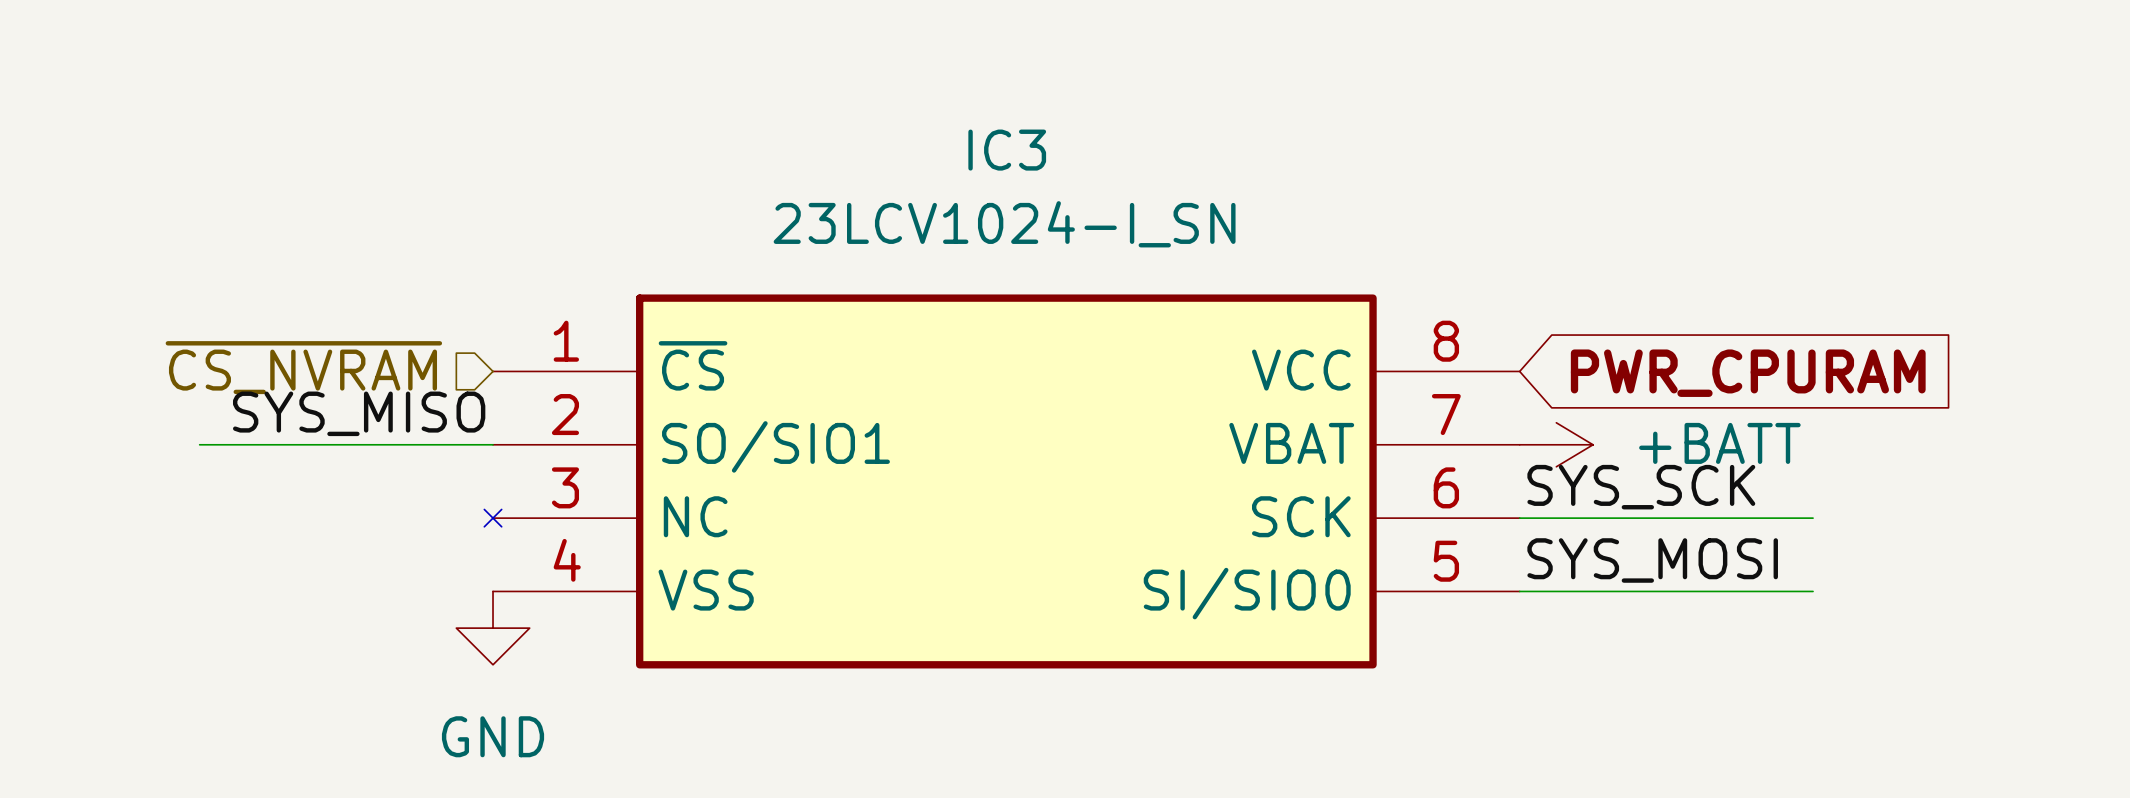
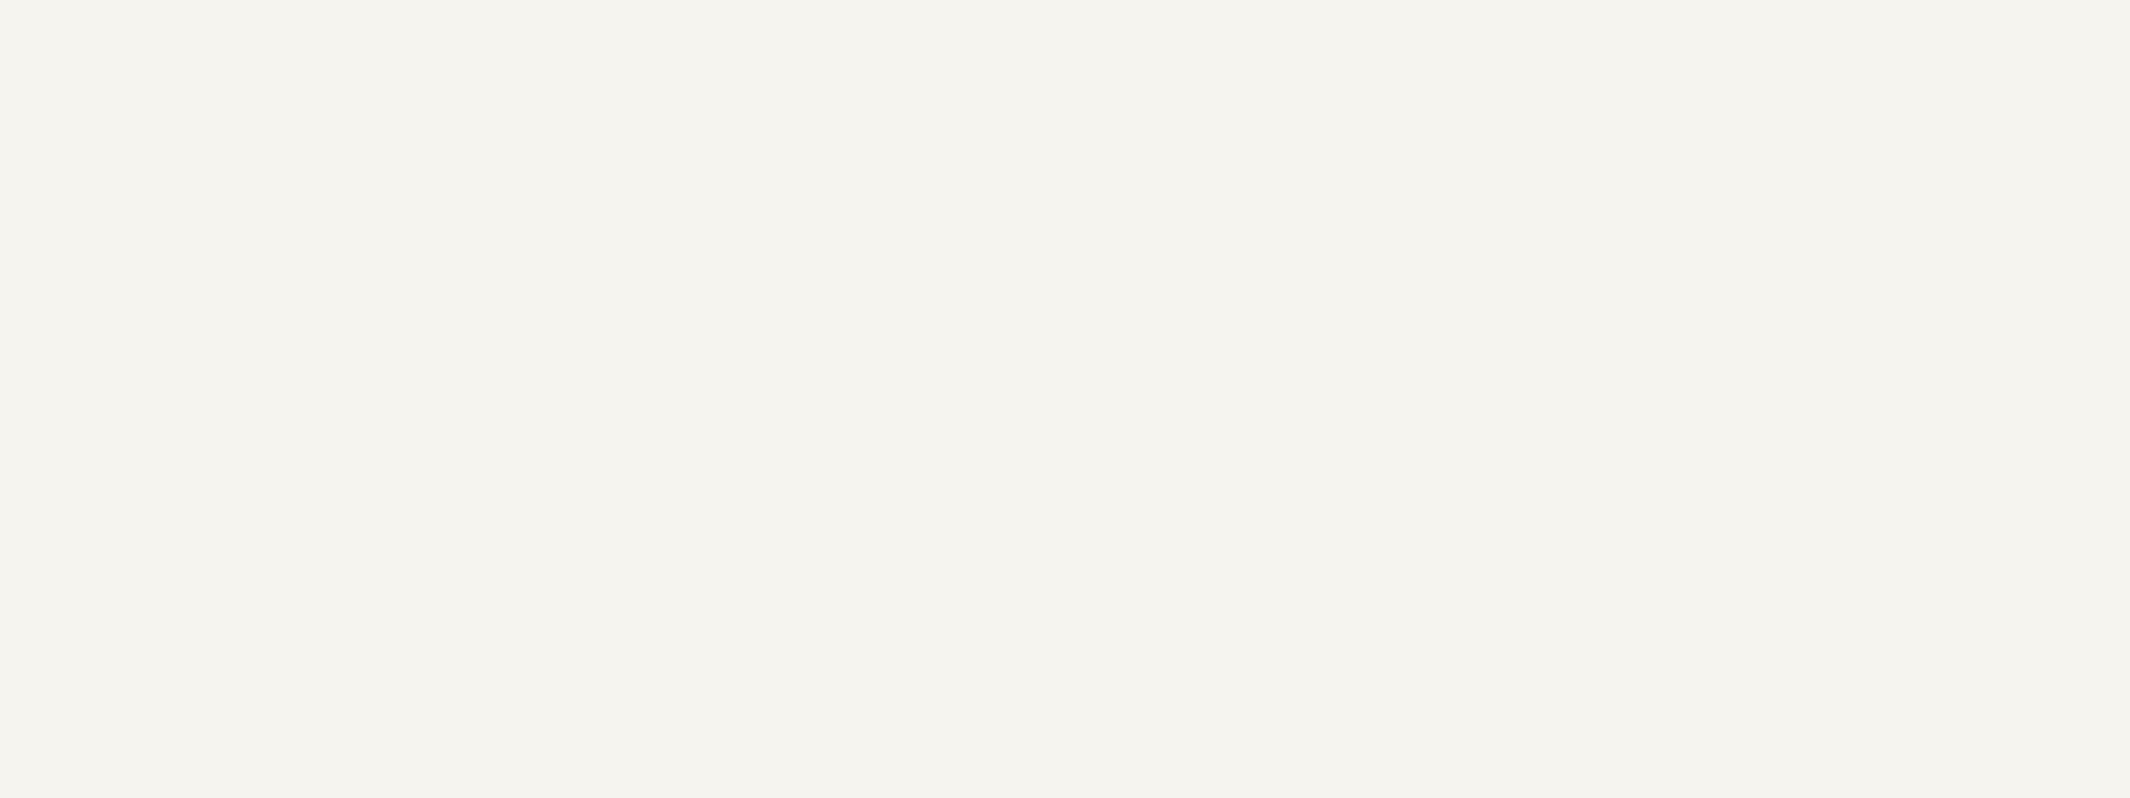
hierarchical label: ~{CS_NVRAM} (303, 367) -> none
global label: PWR_CPURAM (1748, 373) -> none
label: SYS_MISO (359, 413) -> none
wire: (199, 444) (493, 444) -> none
power symbol: +BATT (1556, 444) -> none
IC3: 23LCV1024-I_SN (1002, 481) -> none
label: SYS_SCK (1641, 487) -> none
wire: (1519, 518) (1813, 518) -> none
label: SYS_MOSI (1652, 560) -> none
wire: (1519, 591) (1813, 591) -> none
power symbol: GND (493, 628) -> none

